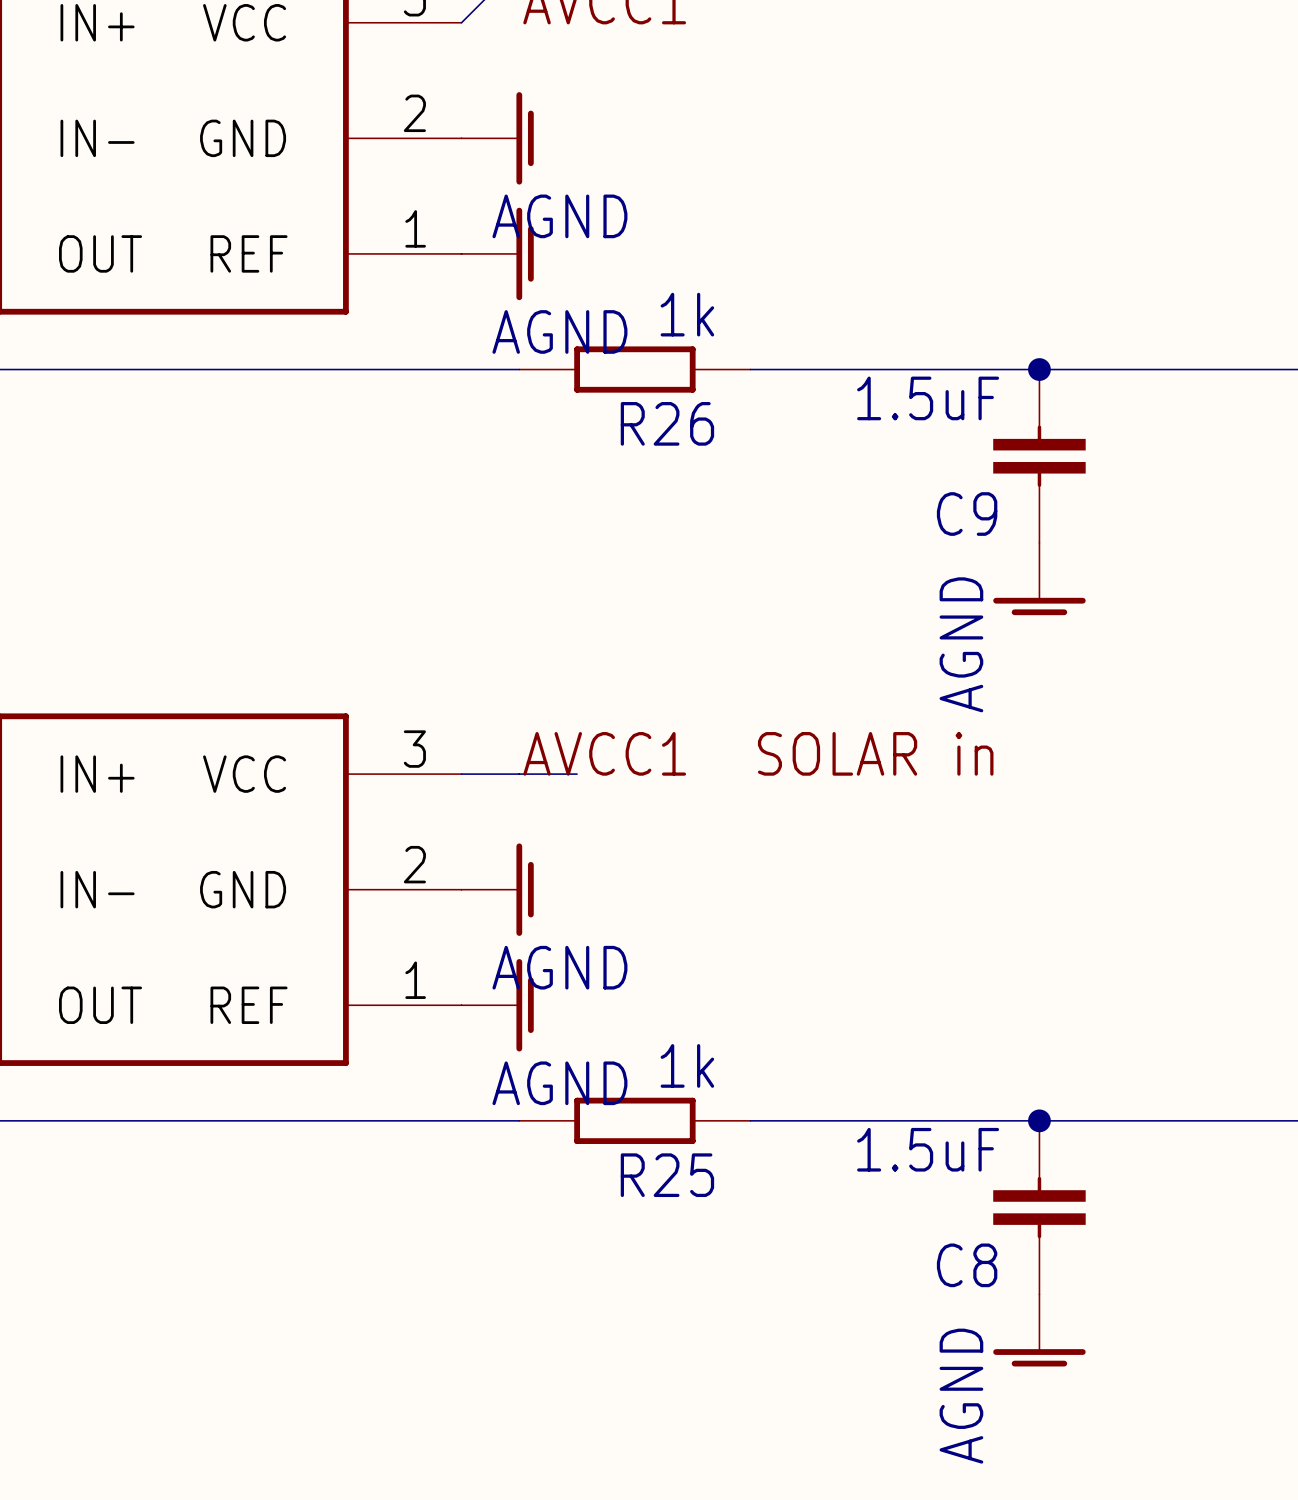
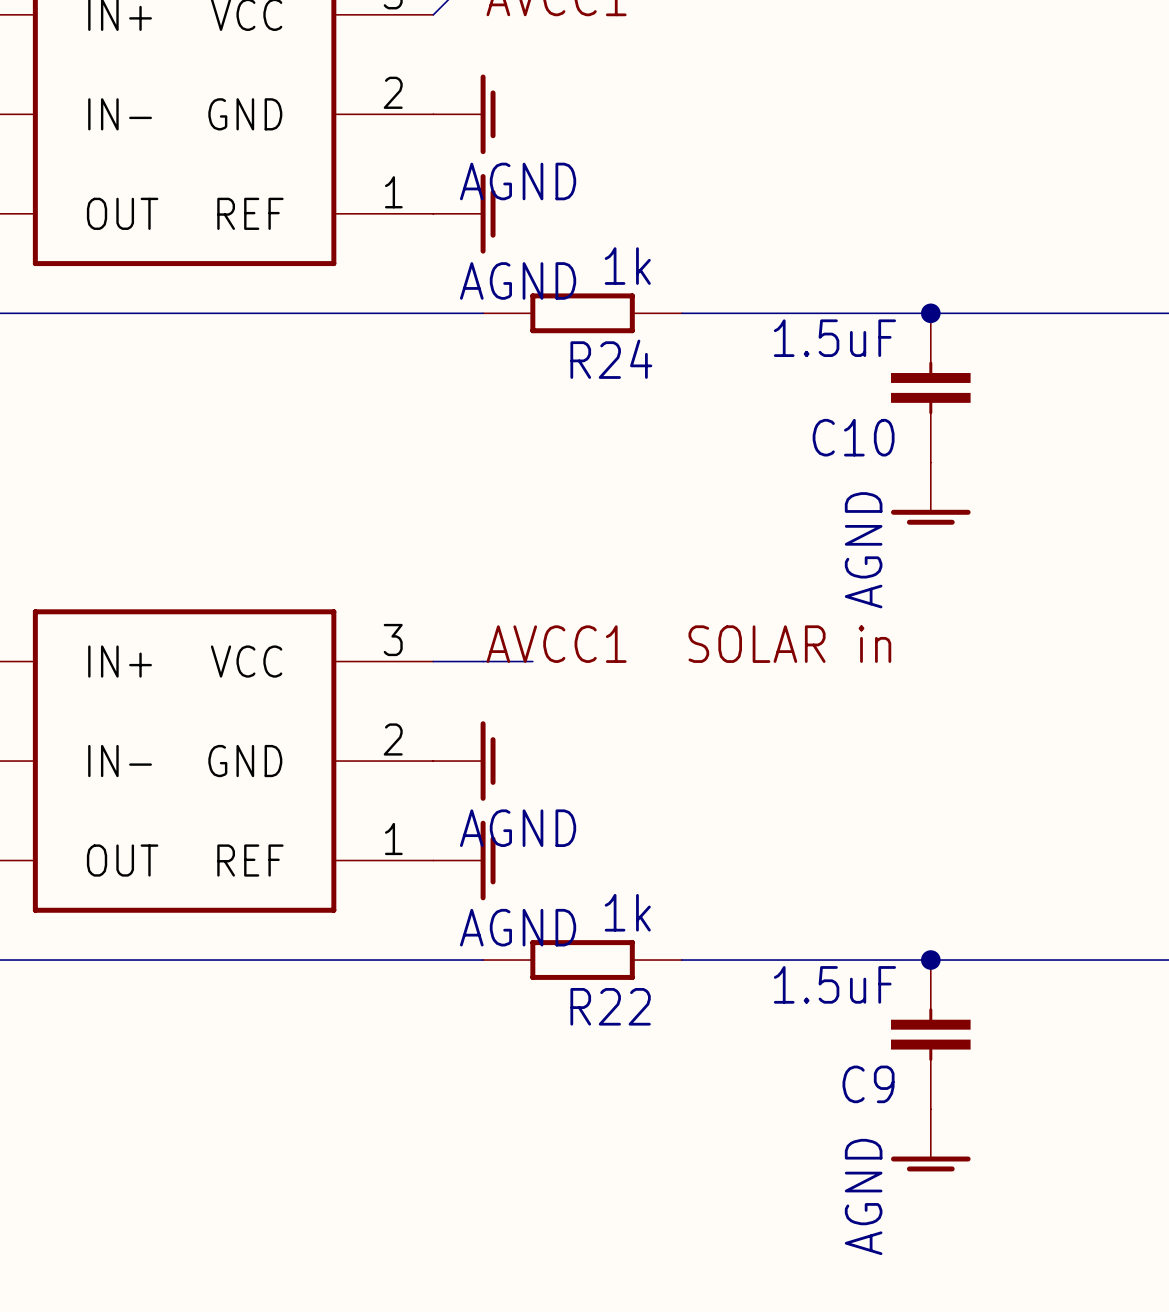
R26 name: R26 (667, 423) -> R24 (611, 359)
C9 name: C9 (967, 514) -> C10 (853, 437)
R25 name: R25 (667, 1175) -> R22 (610, 1006)
C8 name: C8 (967, 1265) -> C9 (868, 1084)

